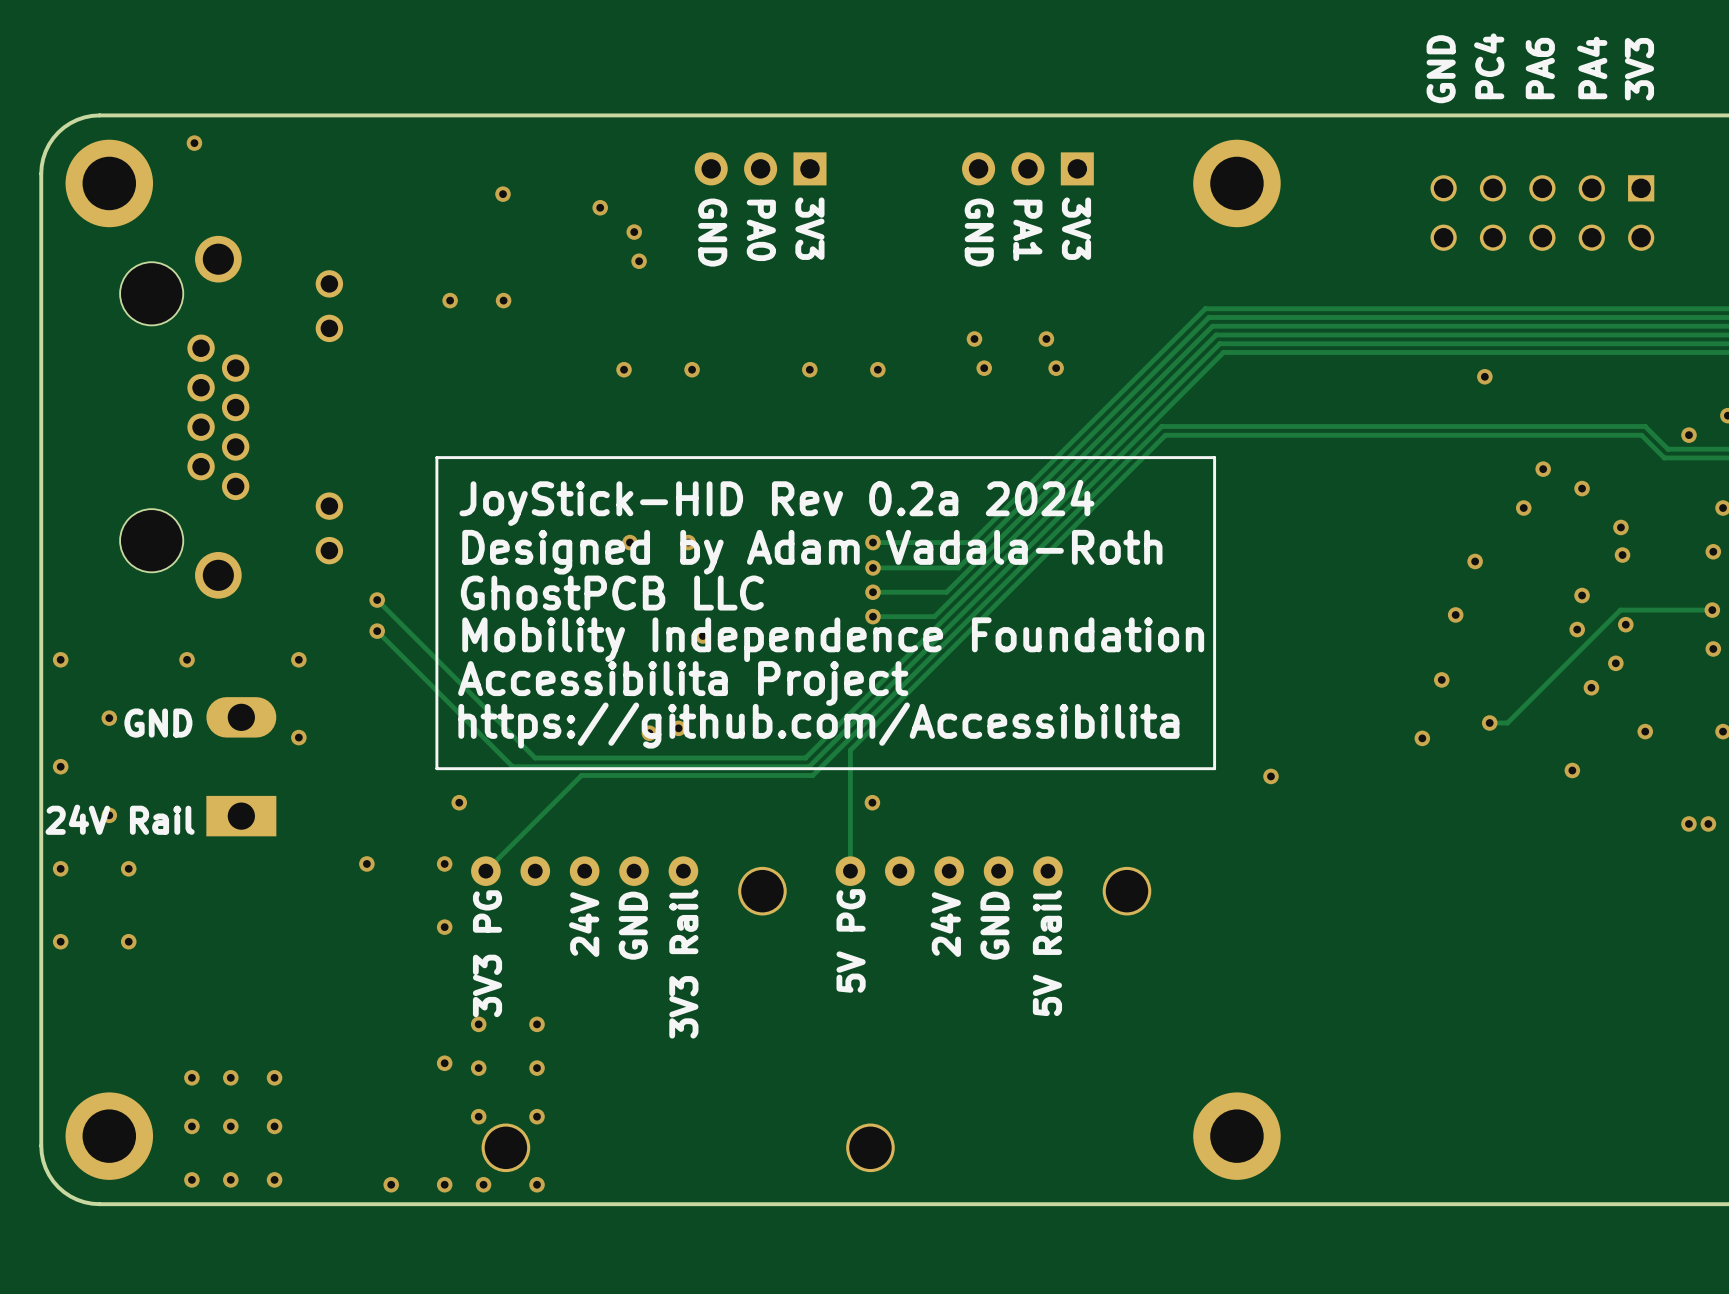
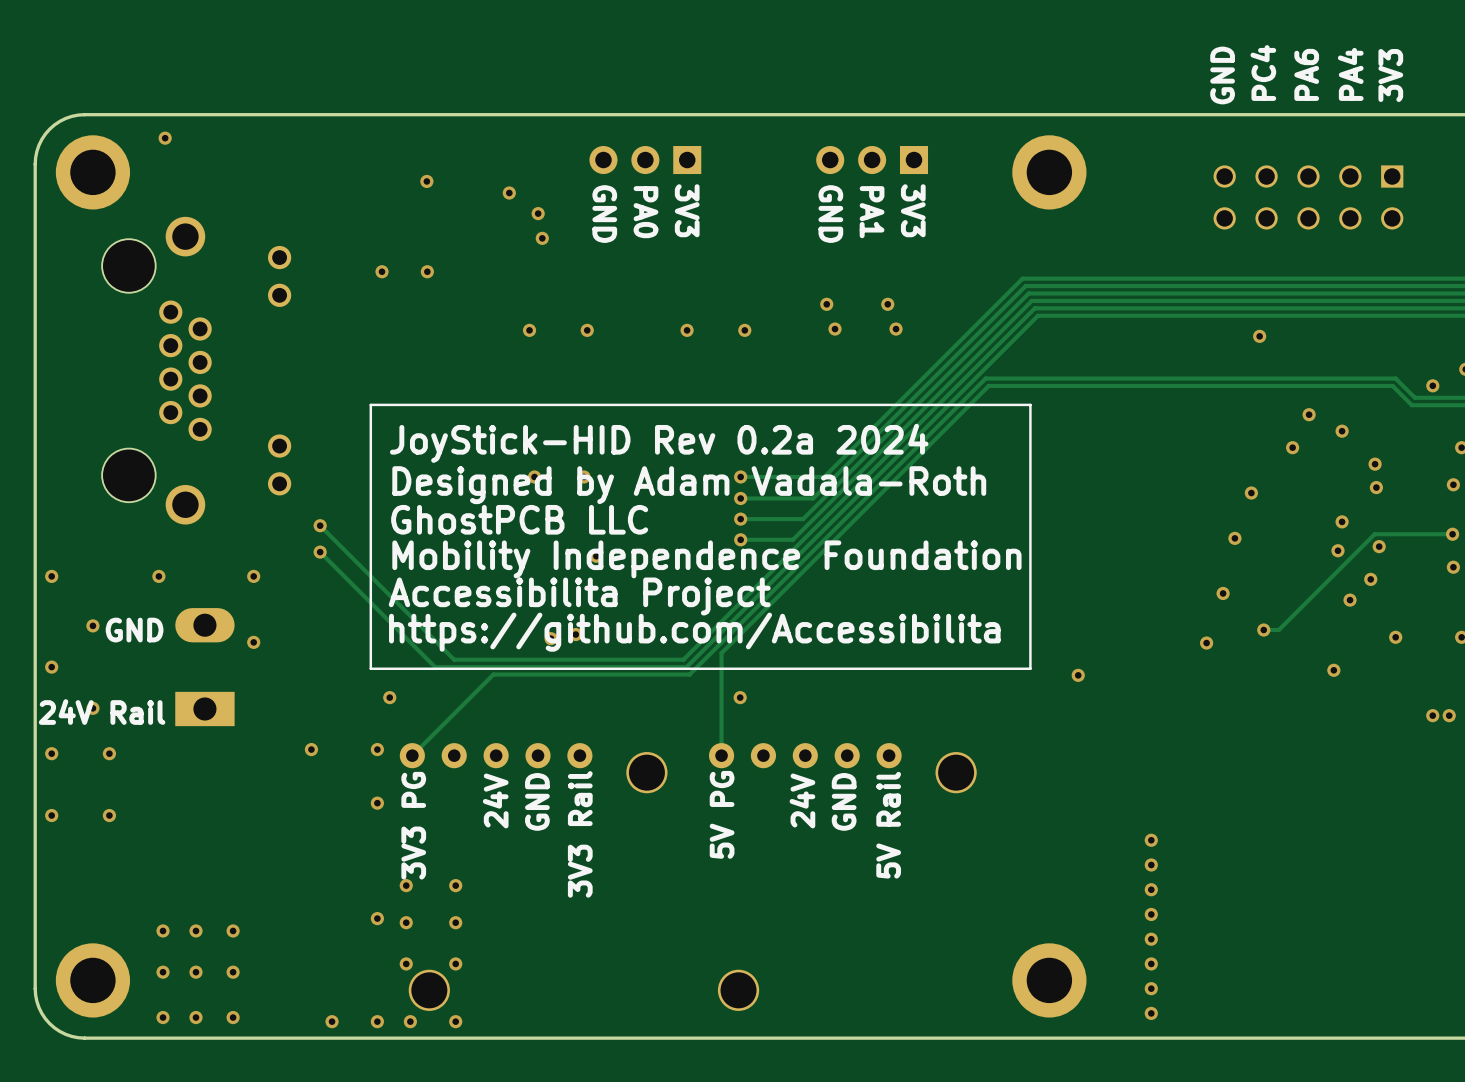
via: none -> (1151, 840)
via: none -> (1151, 864)
via: none -> (1151, 889)
via: none -> (1151, 914)
via: none -> (1151, 939)
via: none -> (1151, 963)
via: none -> (1151, 988)
via: none -> (1151, 1013)

